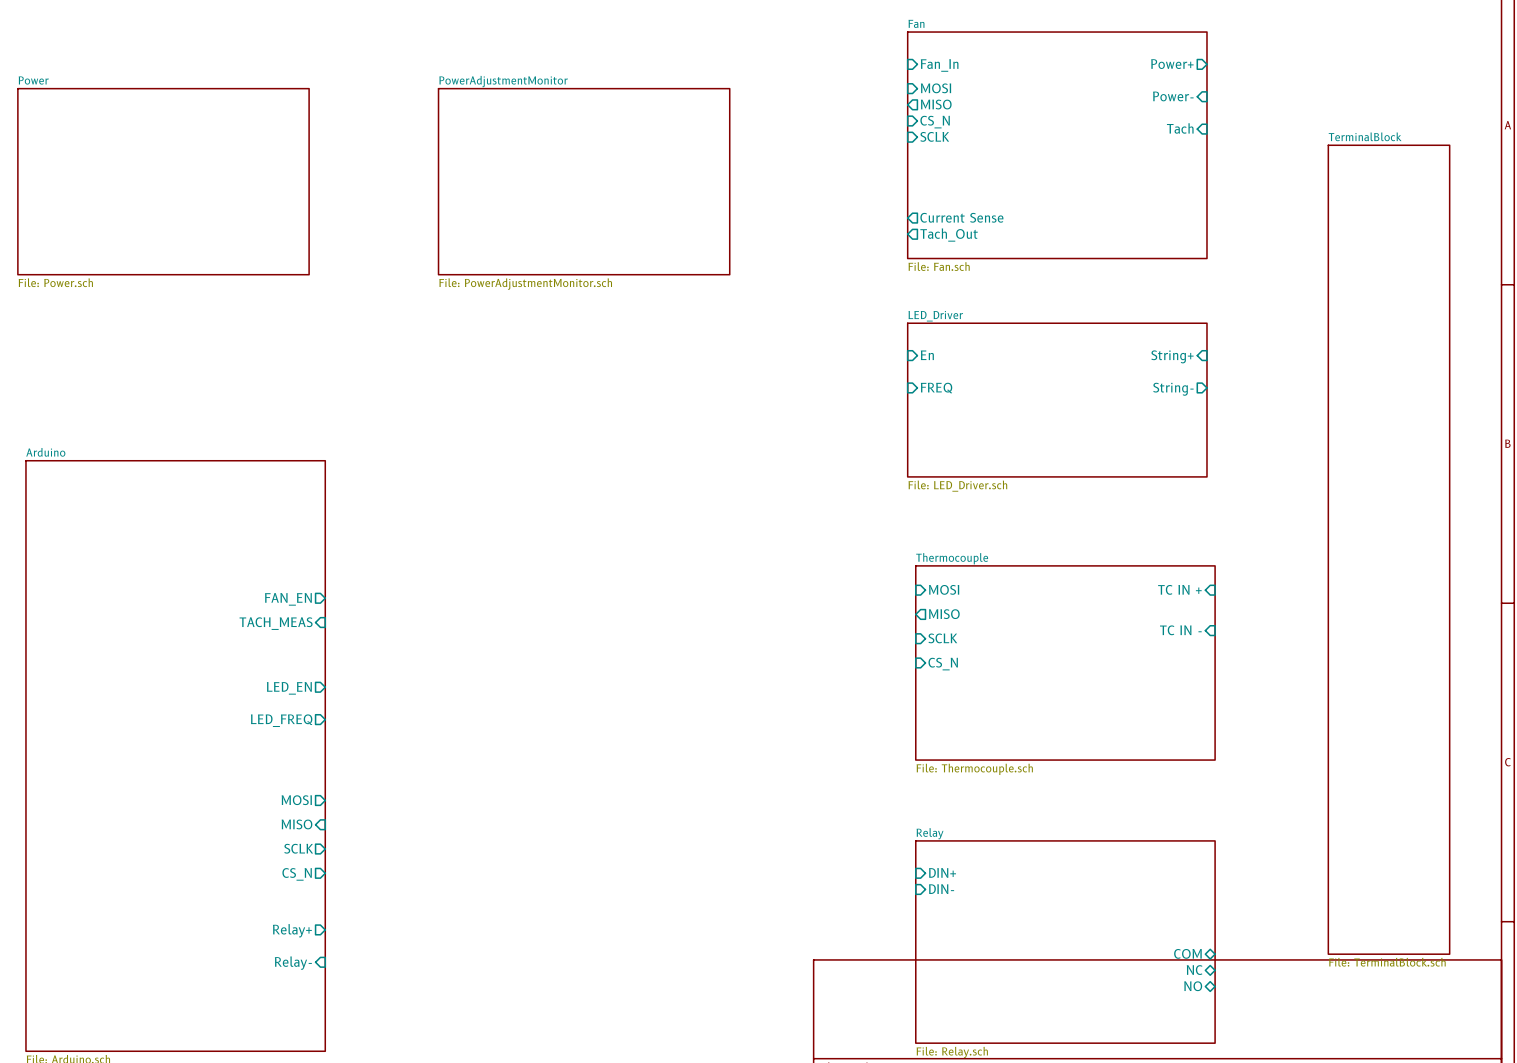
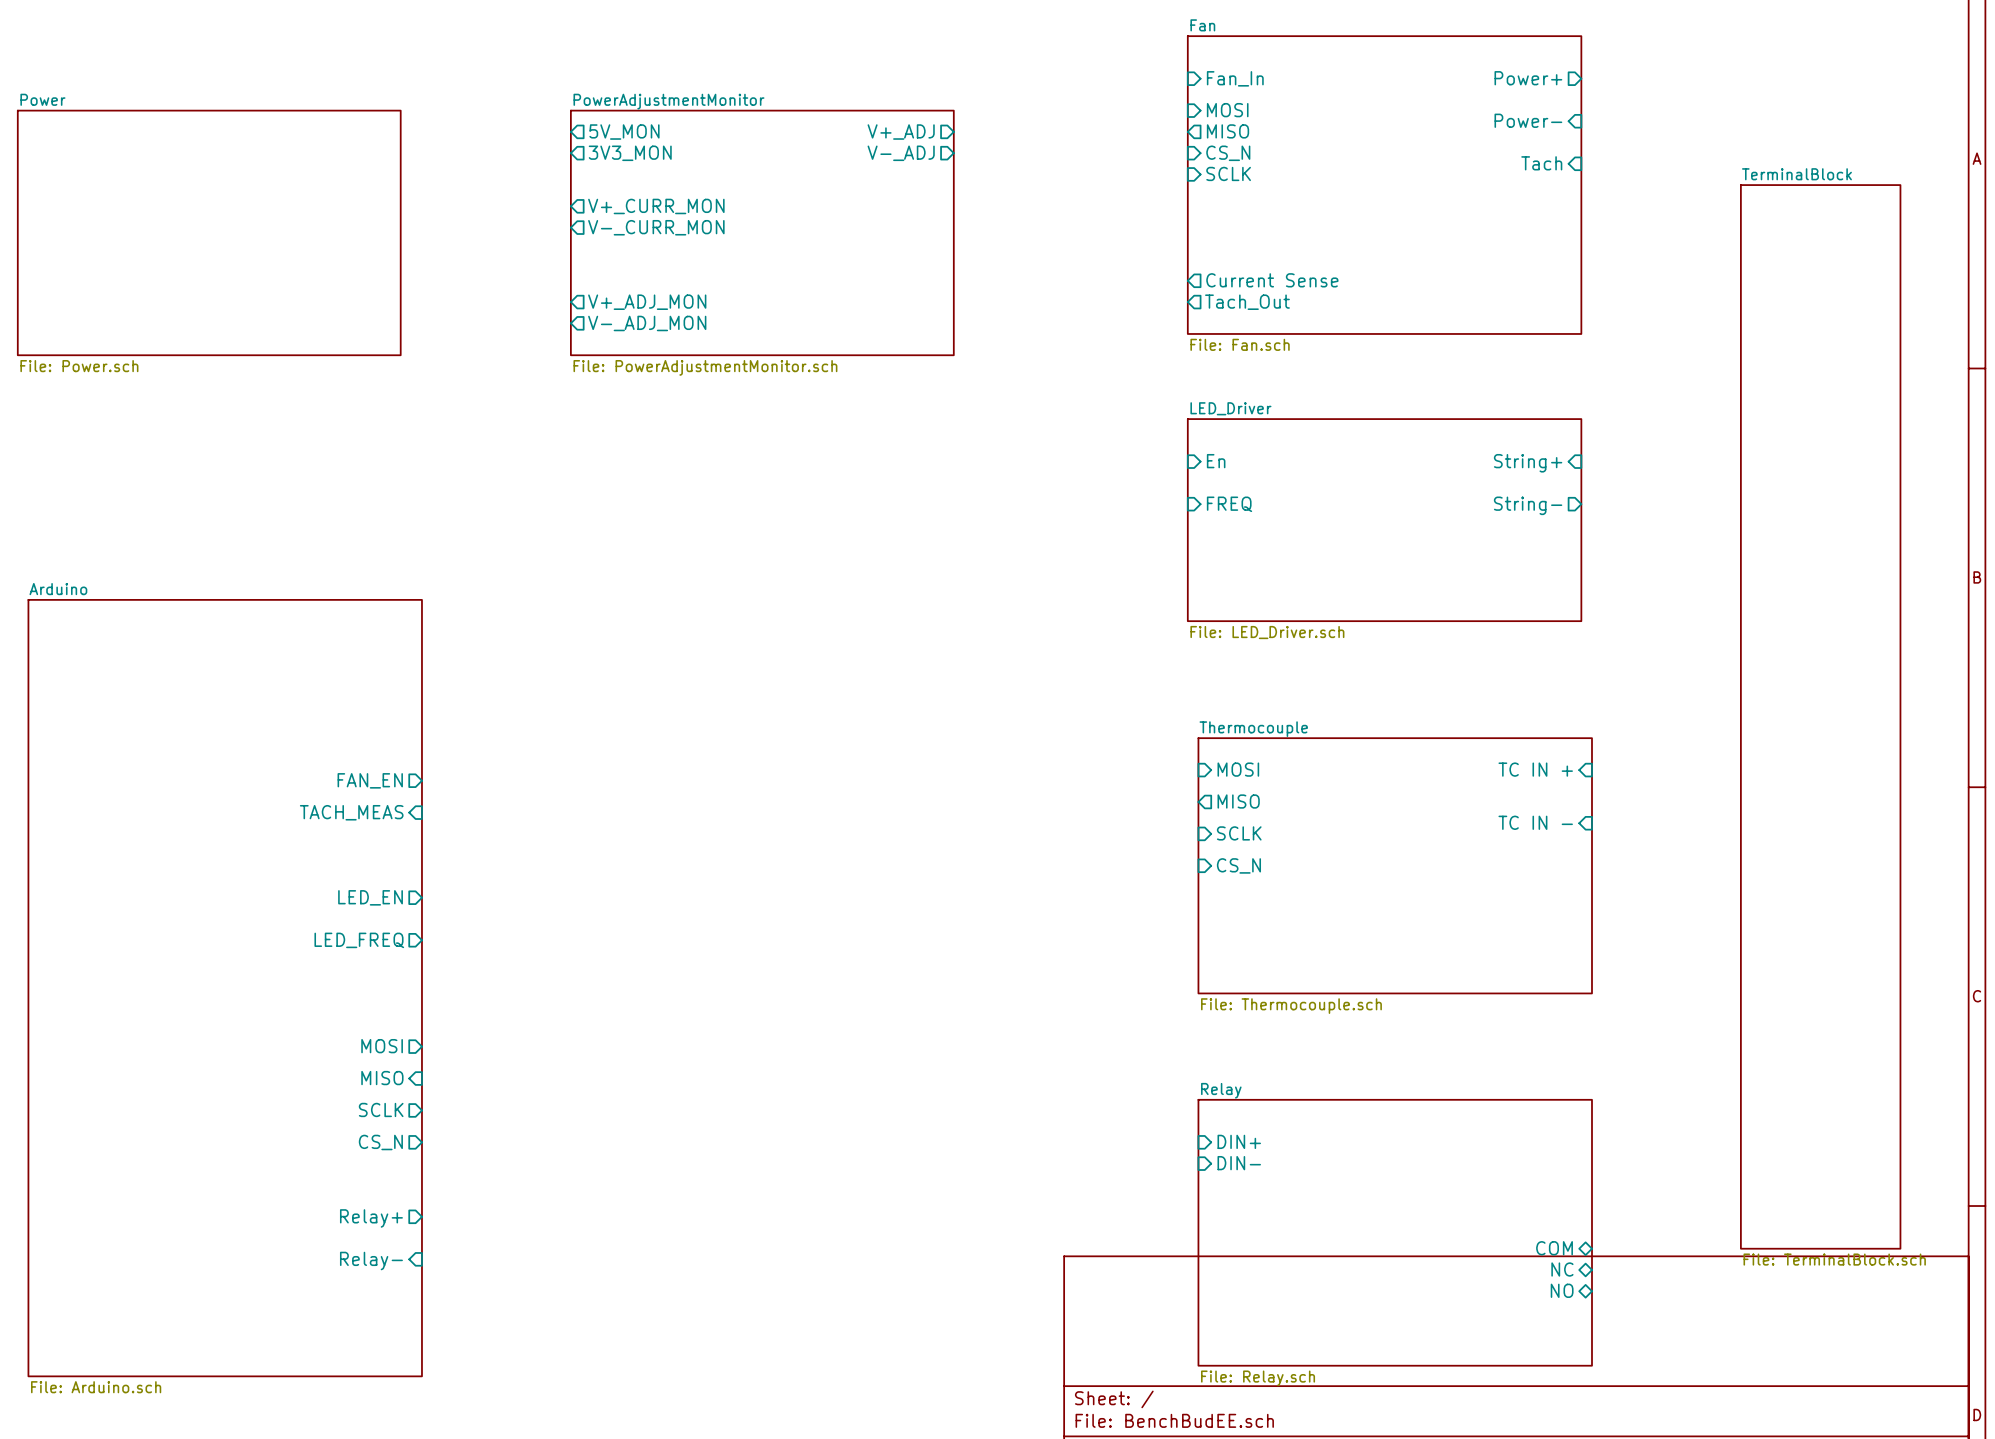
sheet pin: none -> 5V_MON (624, 132)
sheet pin: none -> V+_ADJ (901, 132)
sheet pin: none -> 3V3_MON (630, 153)
sheet pin: none -> V-_ADJ (901, 153)
sheet pin: none -> V+_CURR_MON (656, 206)
sheet pin: none -> V-_CURR_MON (656, 227)
sheet pin: none -> V+_ADJ_MON (647, 302)
sheet pin: none -> V-_ADJ_MON (647, 323)

